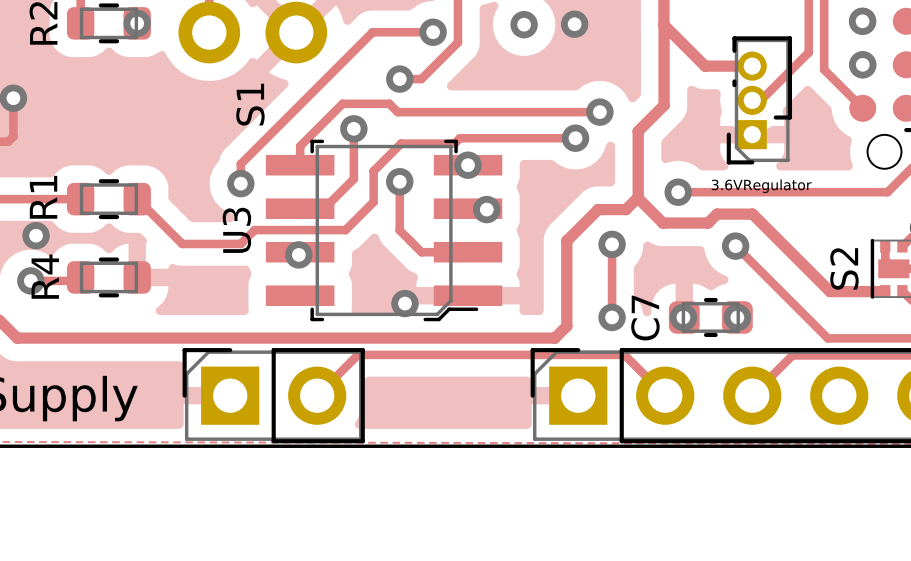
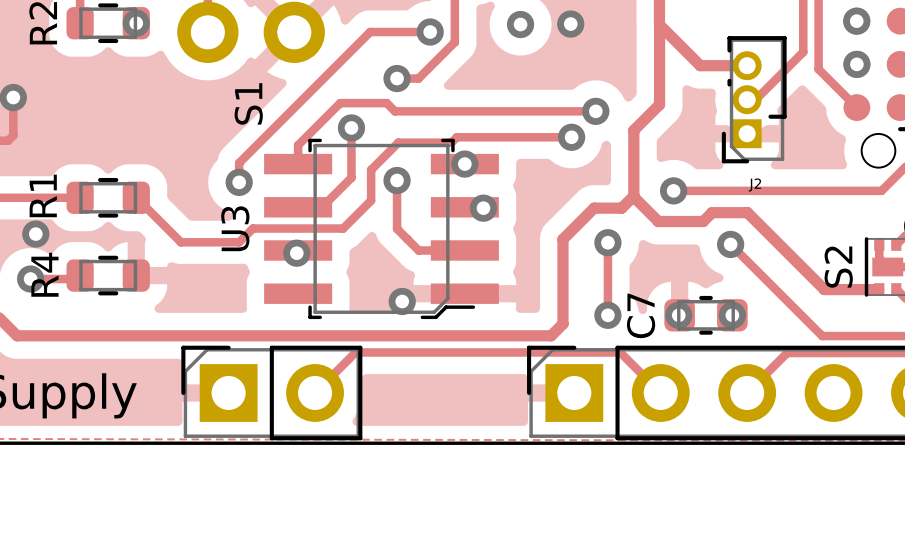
3.6VRegulator name: 3.6VRegulator (761, 186) -> J2 (754, 185)

